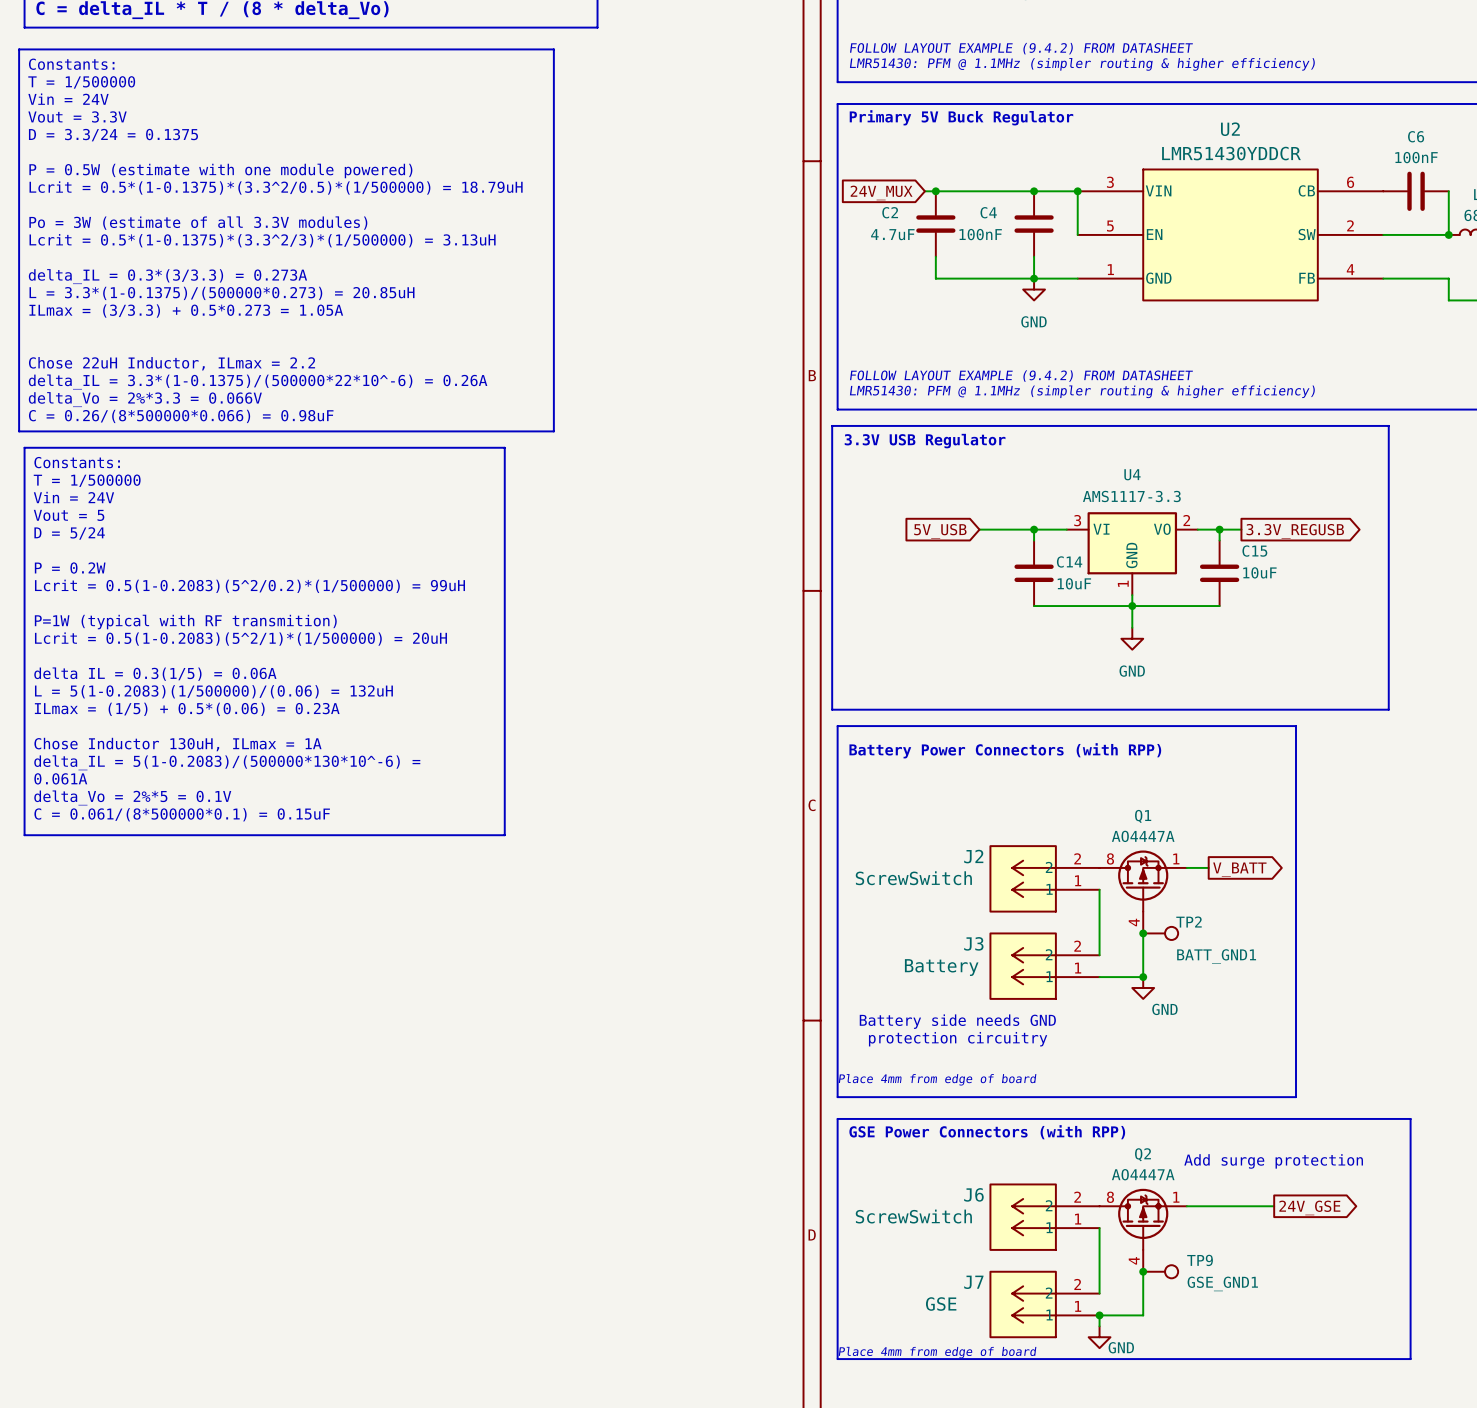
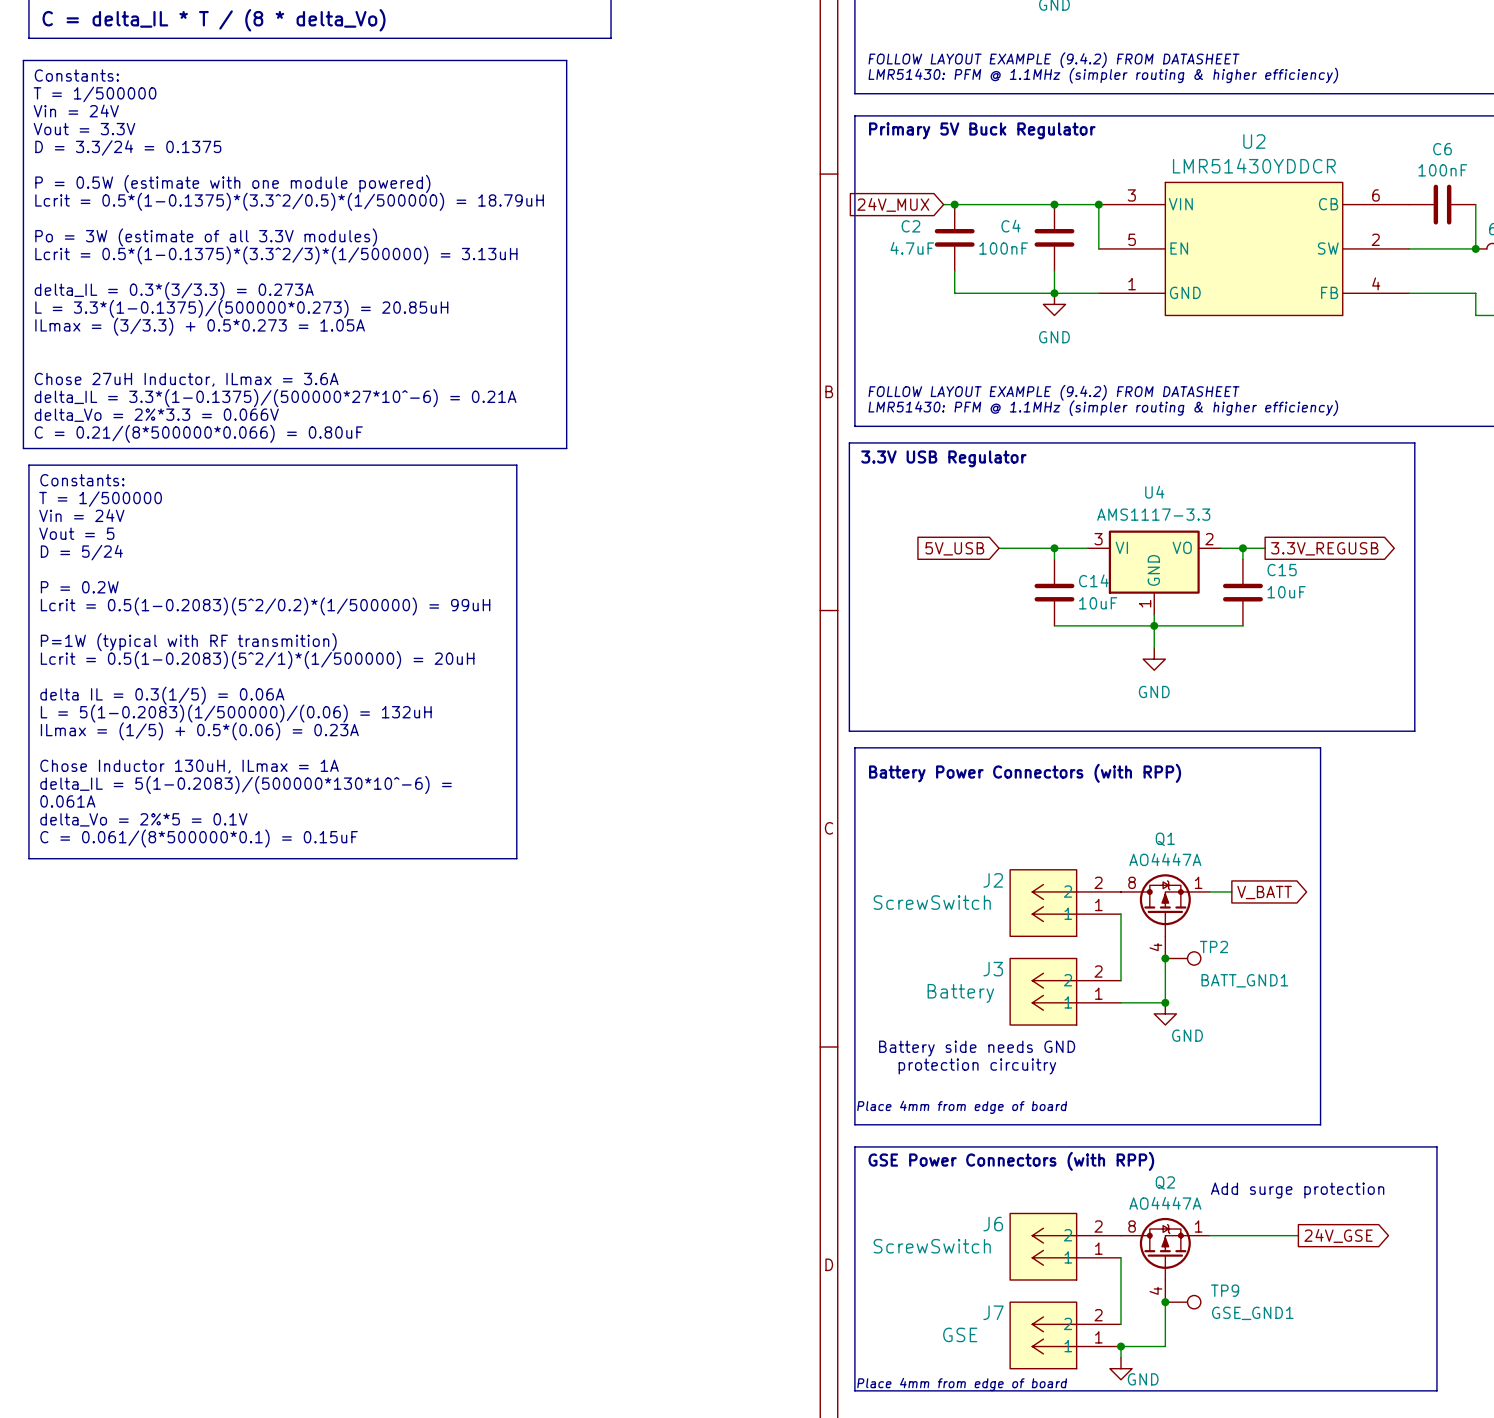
text: Chose 22uH Inductor, ILmax = 2.2 (172, 363) -> Chose 27uH Inductor, ILmax = 3.6A (186, 379)
text: delta_IL = 3.3*(1-0.1375)/(500000*22*10^-6) = 0.26A (258, 382) -> delta_IL = 3.3*(1-0.1375)/(500000*27*10^-6) = 0.21A (275, 398)
text: C = 0.26/(8*500000*0.066) = 0.98uF (181, 416) -> C = 0.21/(8*500000*0.066) = 0.80uF (198, 433)

